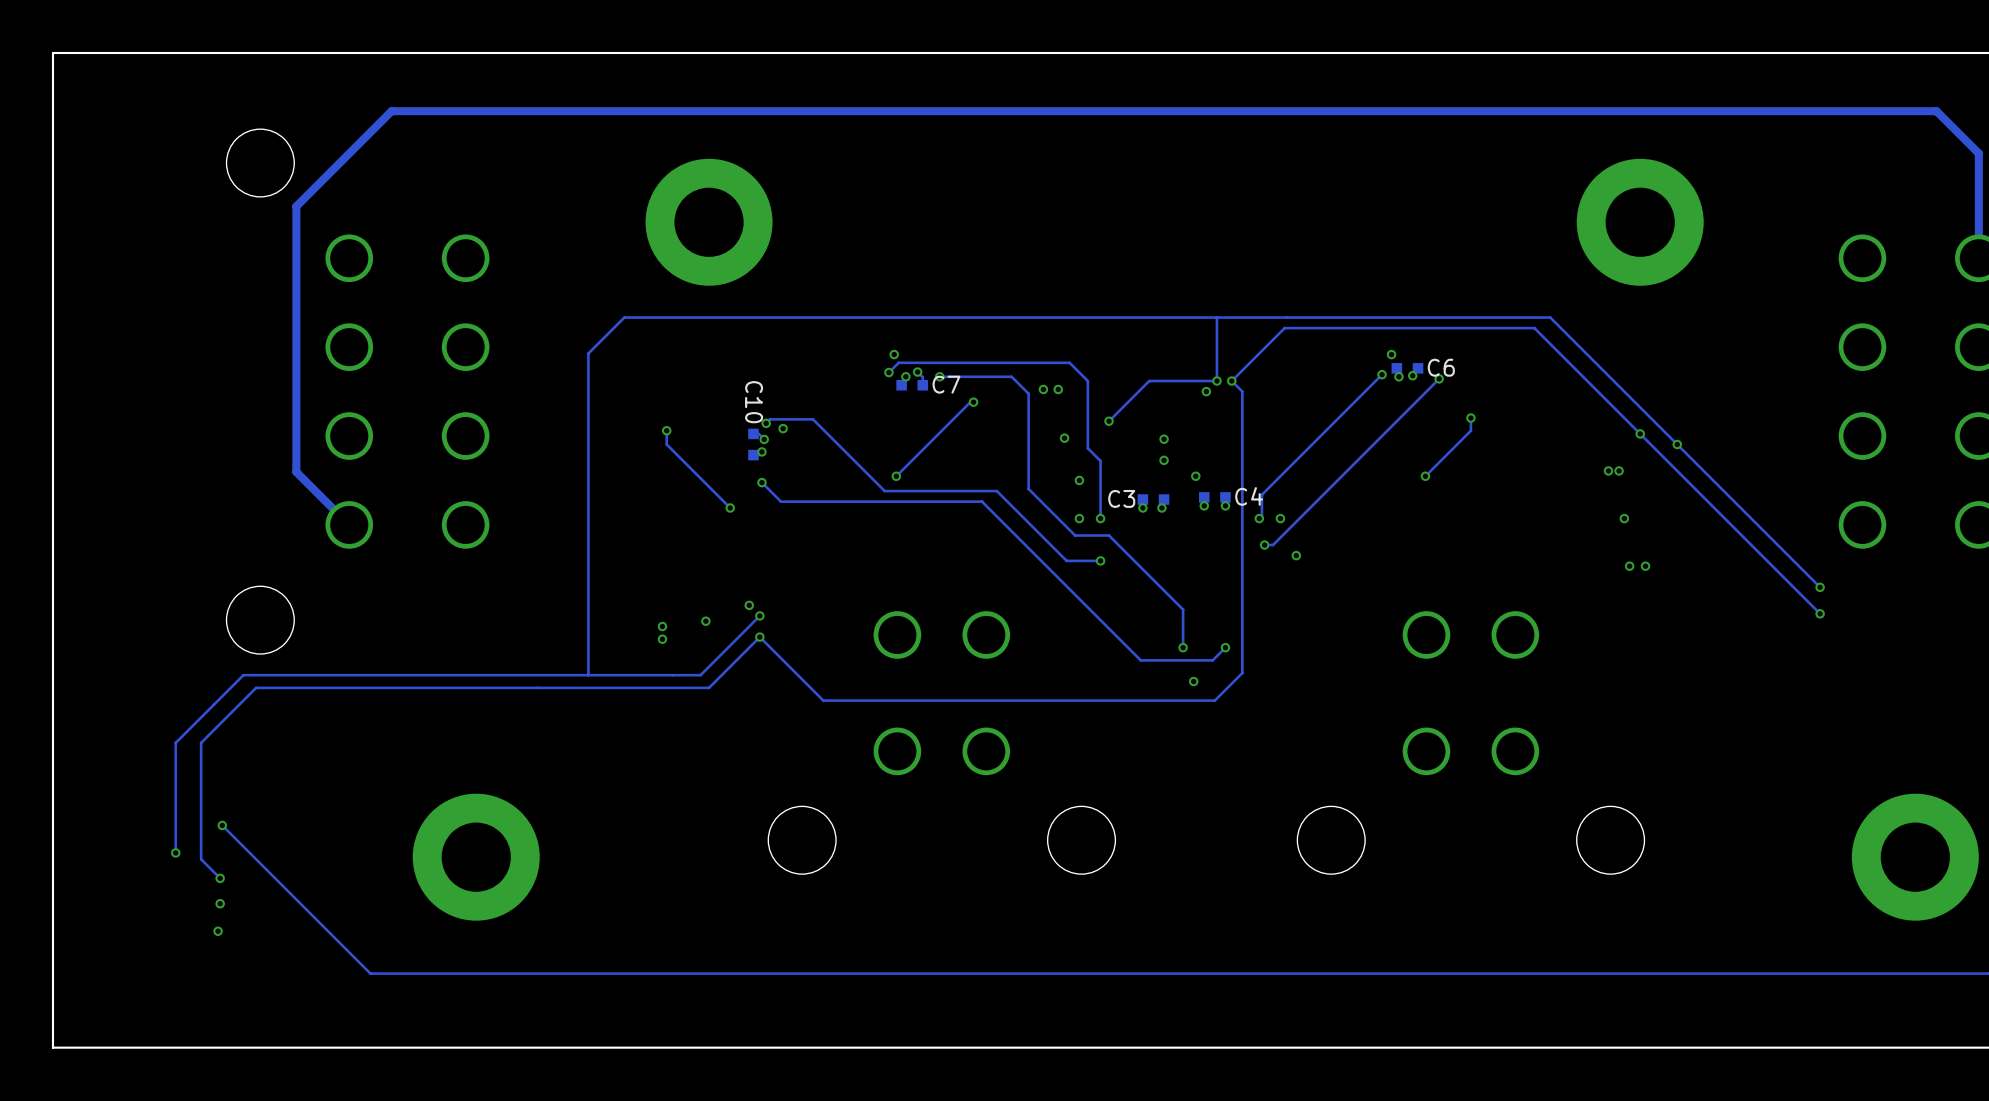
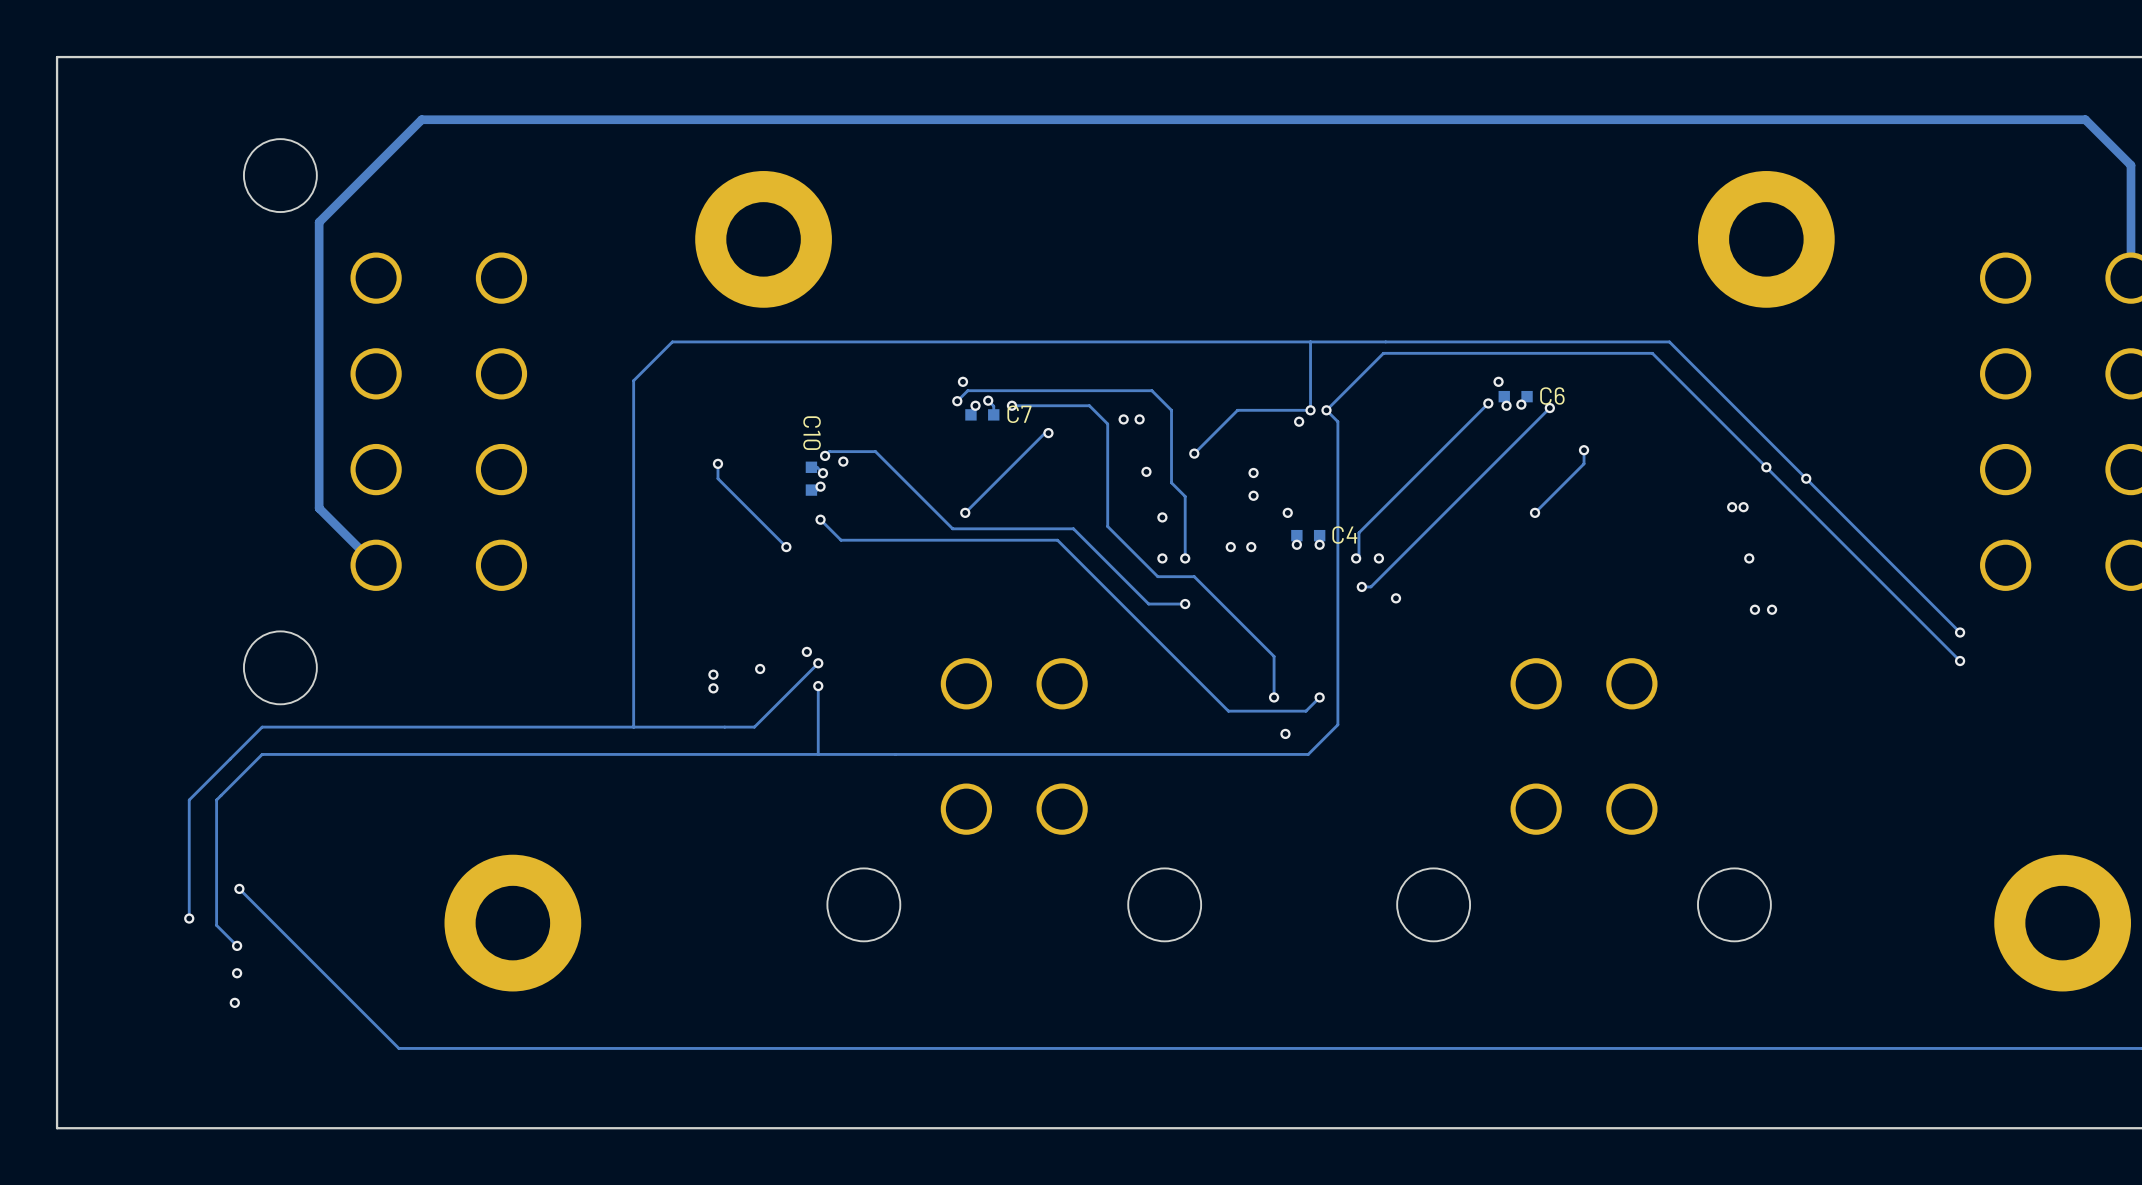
C3: (1153, 499) -> none
track: none -> (818, 686) (818, 754)
track: (823, 700) (759, 637) (709, 687) (256, 687) (243, 700) -> (886, 754) (262, 754)

